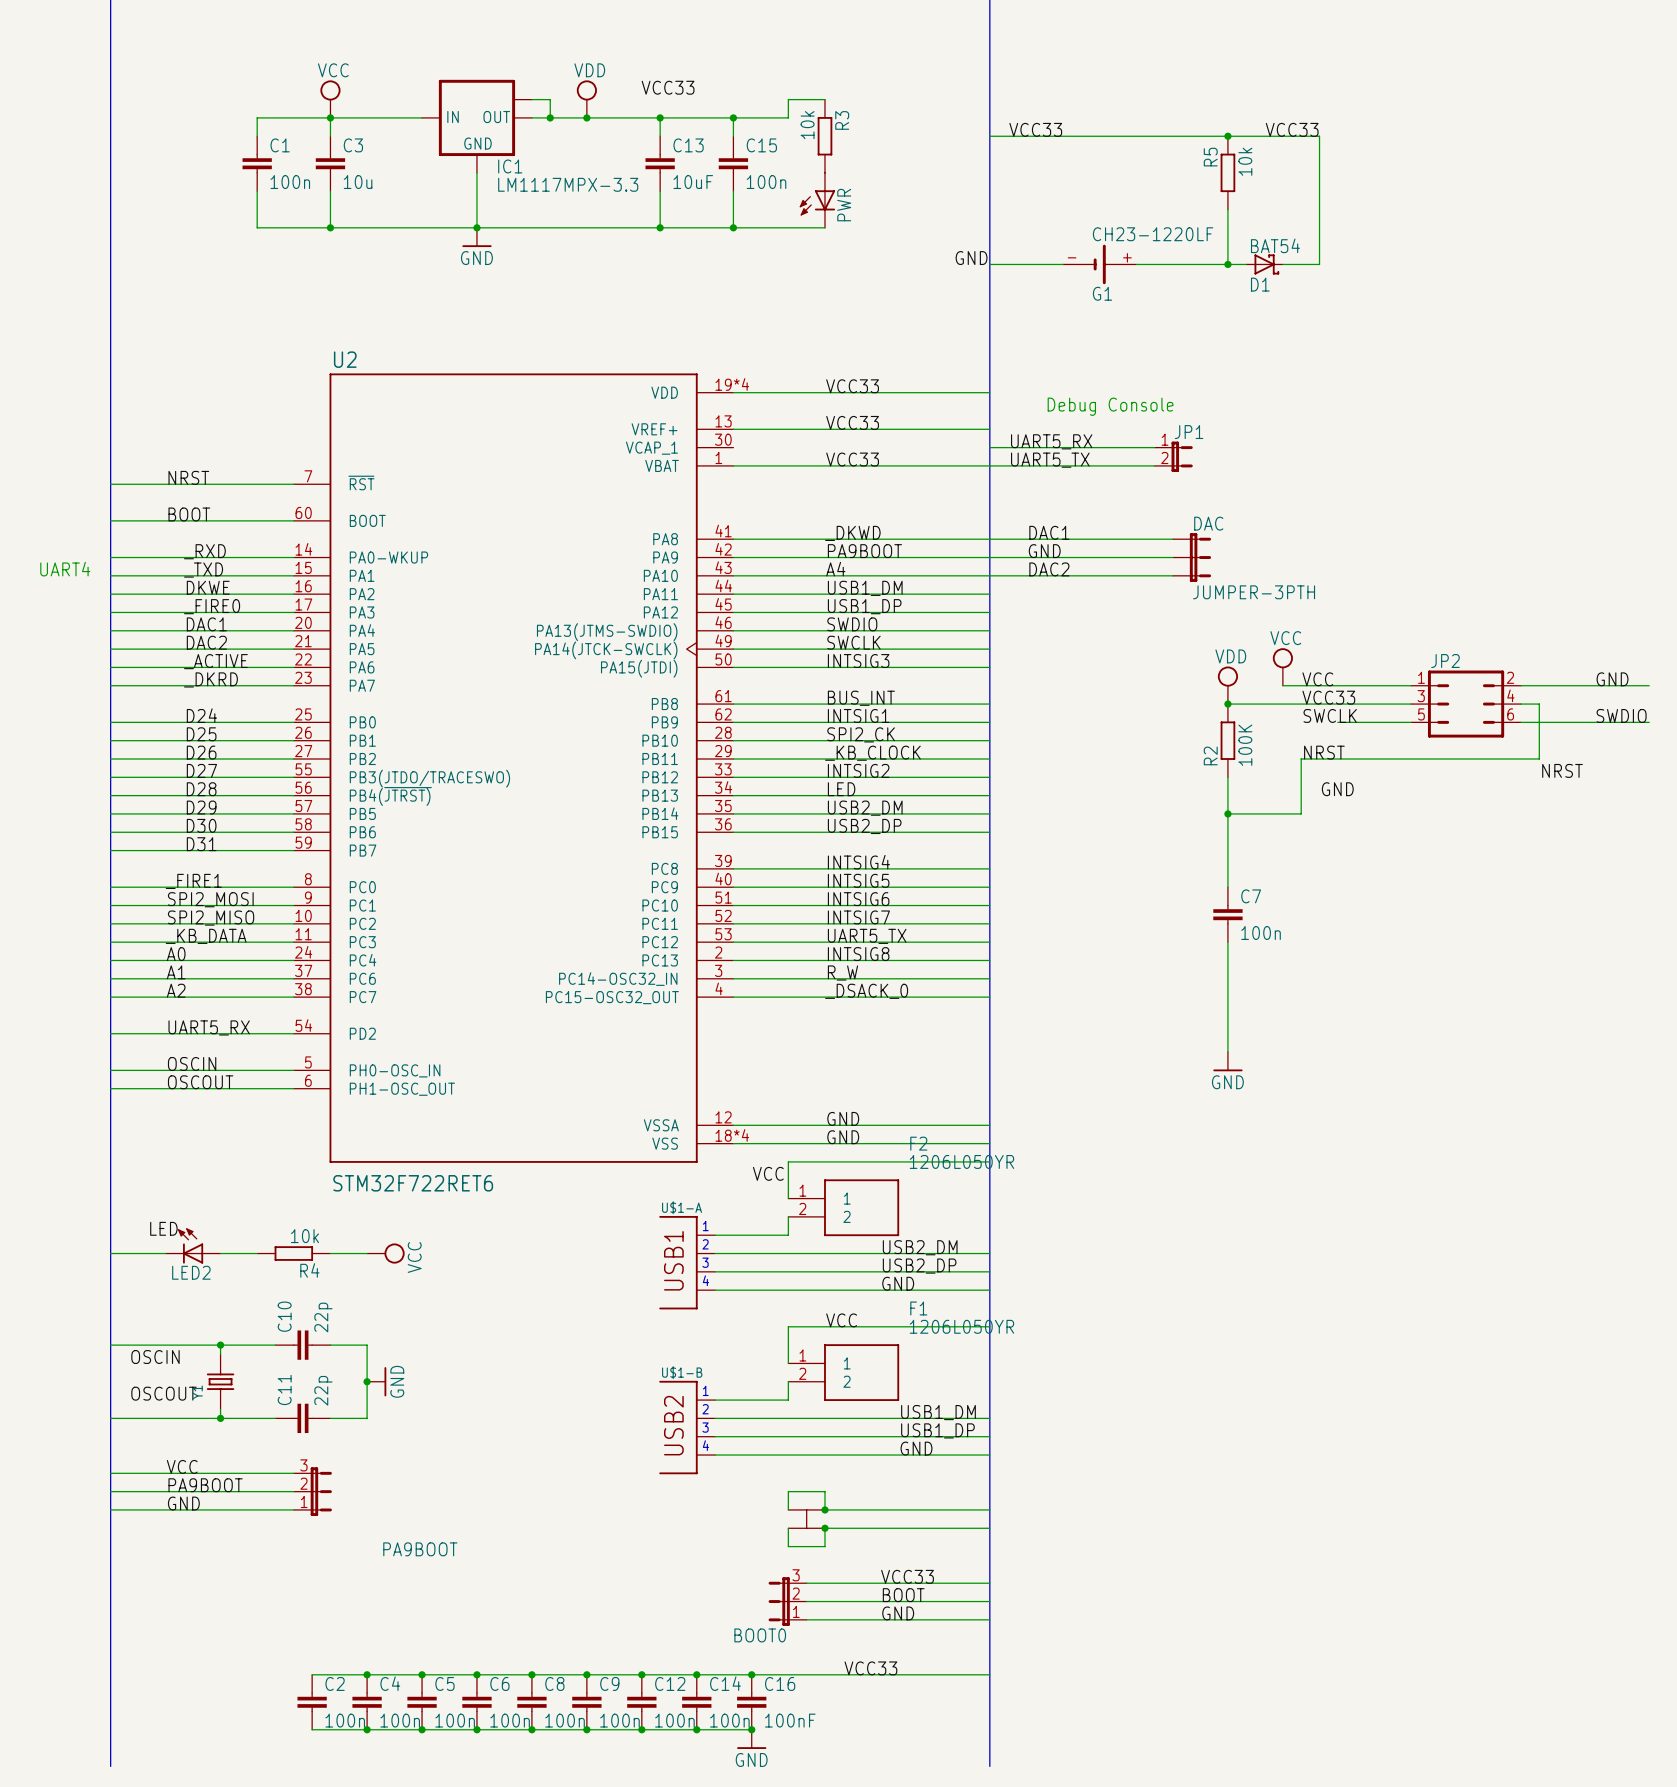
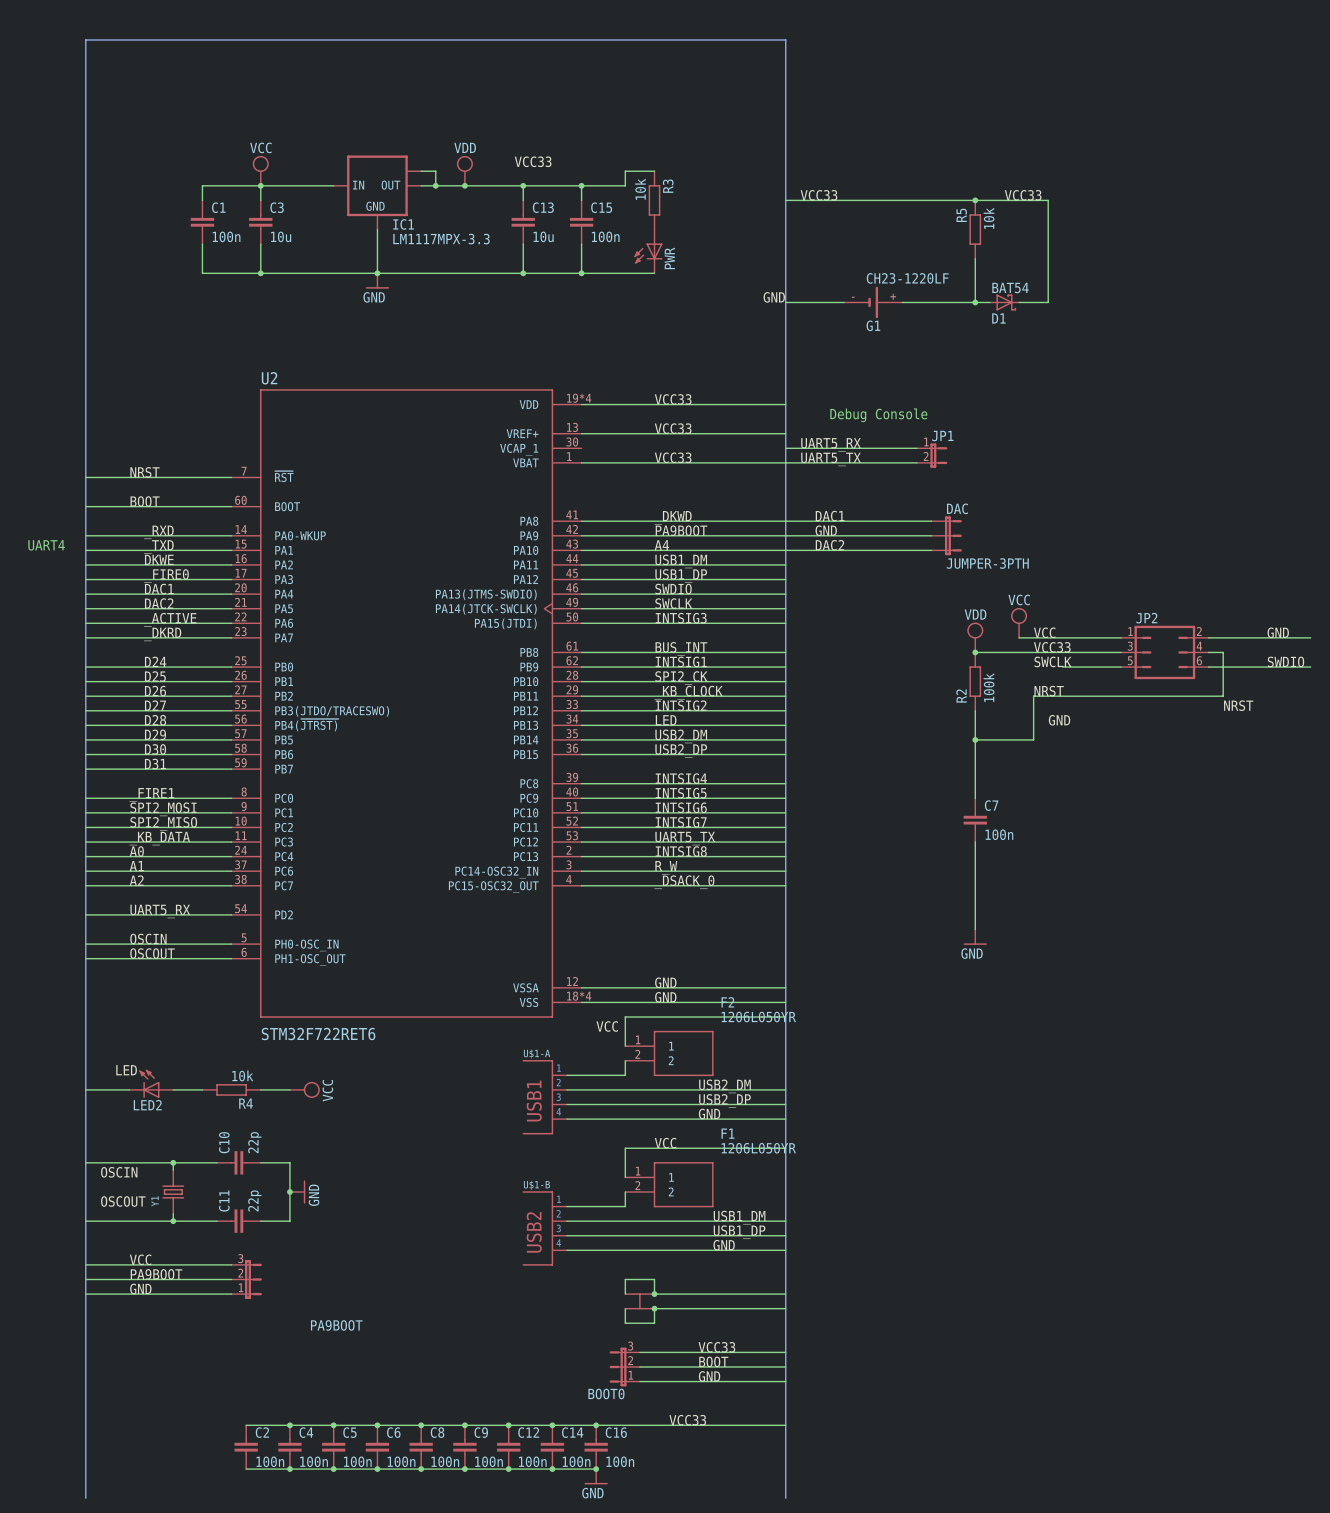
C13 value: 10uF (693, 182) -> 10u (543, 236)
R2 value: 100K (1245, 745) -> 100k (989, 687)
C16 value: 100nF (790, 1720) -> 100n (620, 1461)

